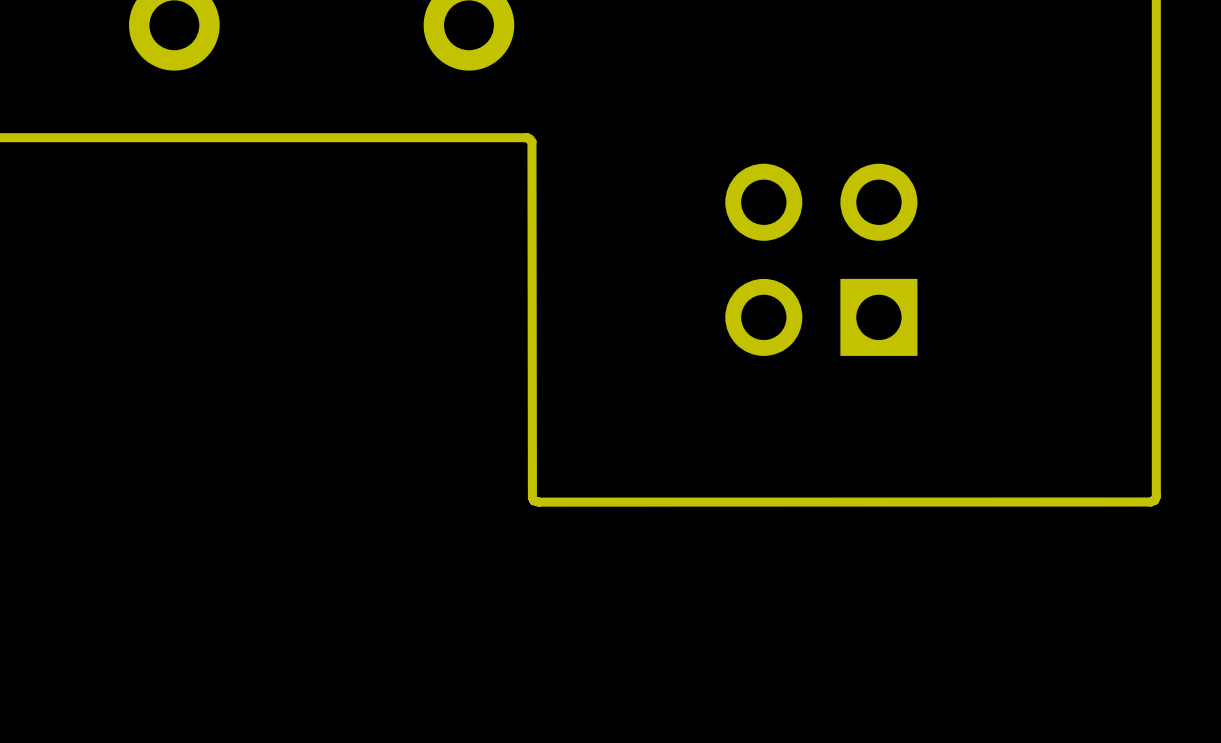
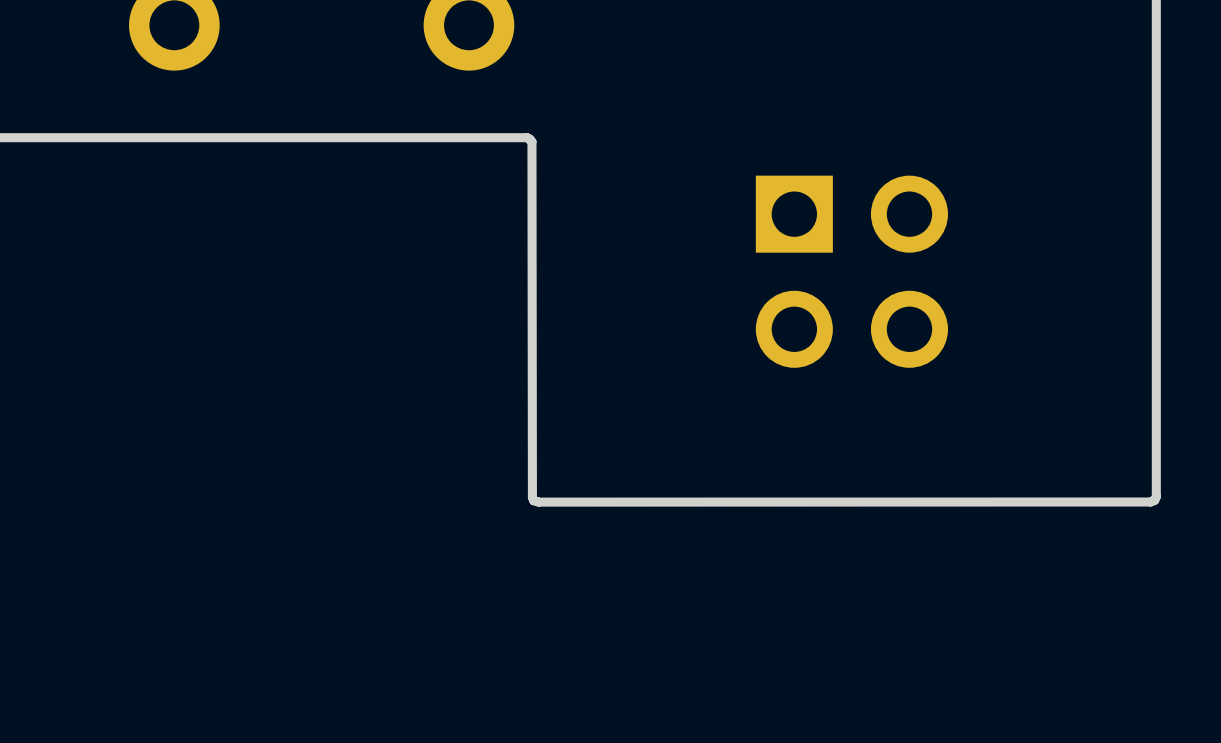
part rotation: 0° (821, 259) -> 180° (851, 271)

